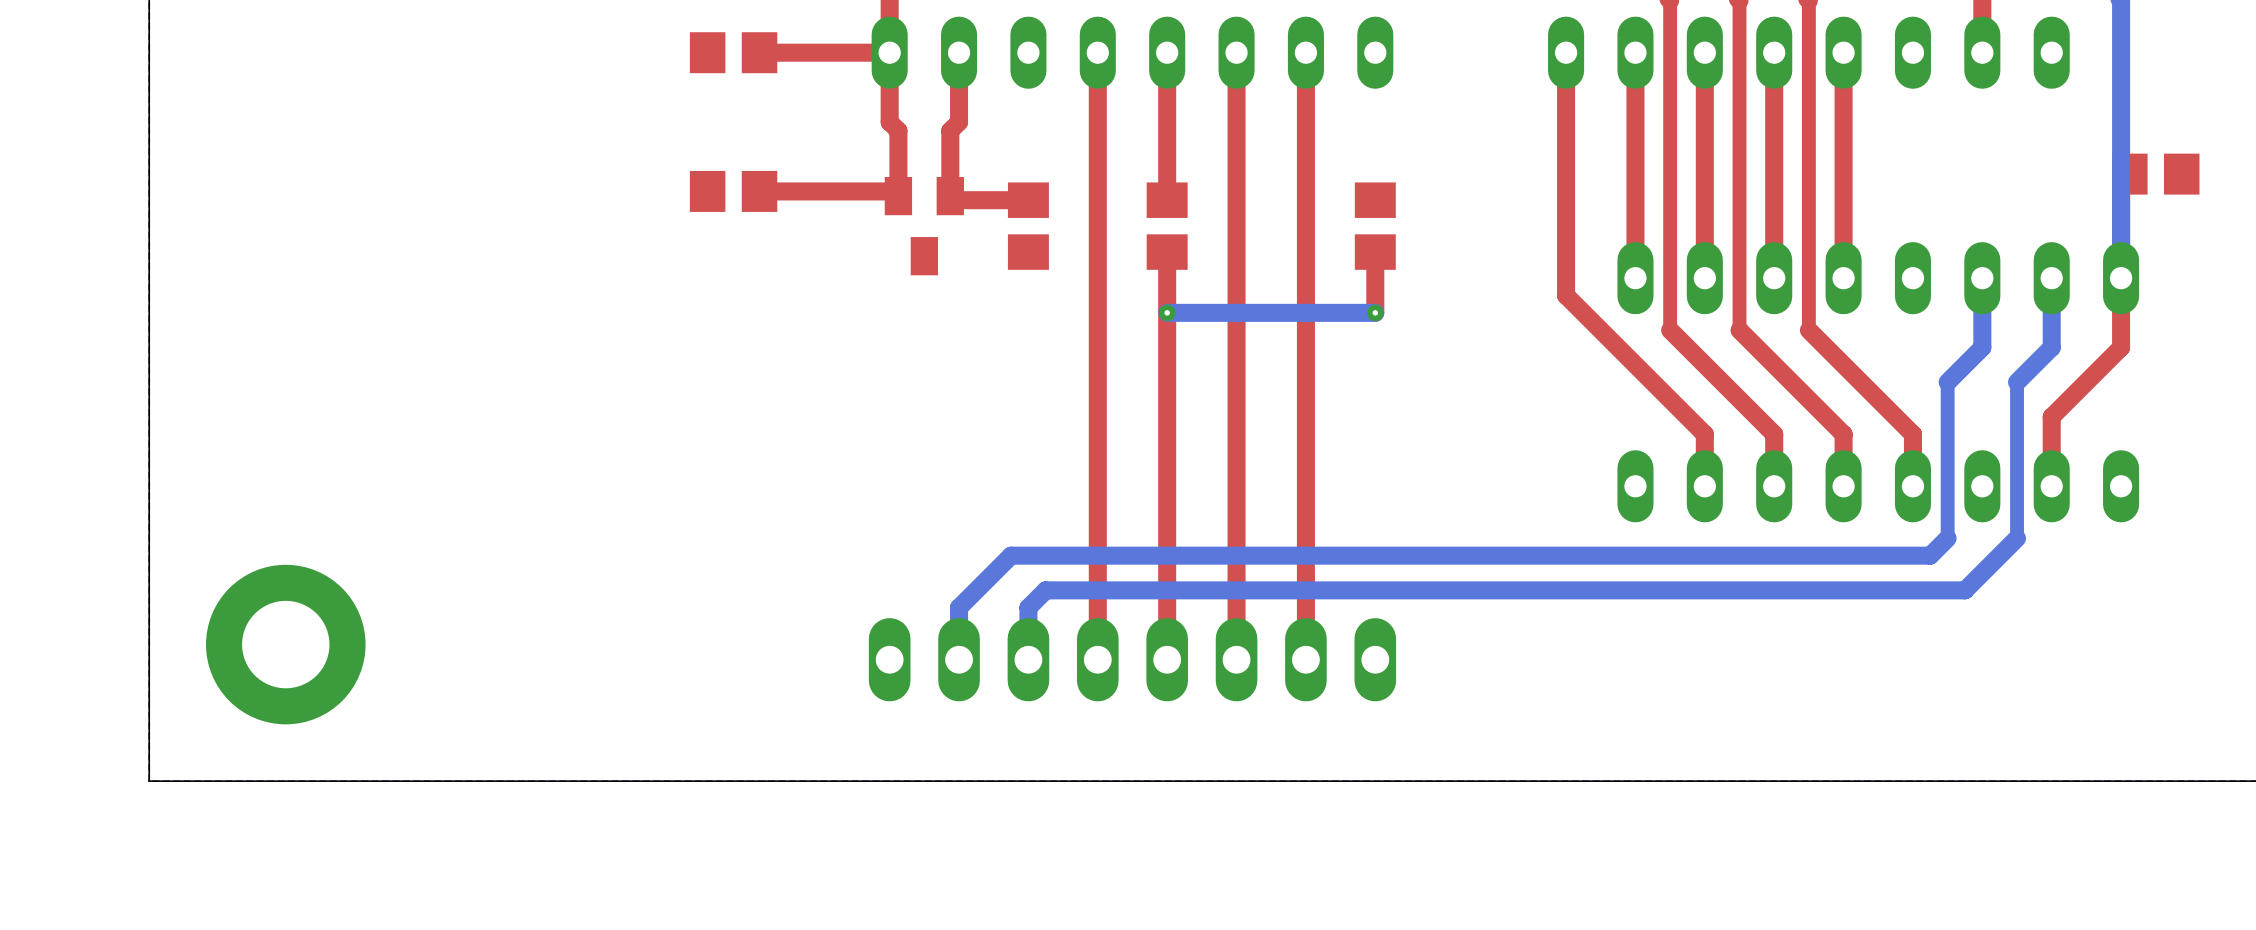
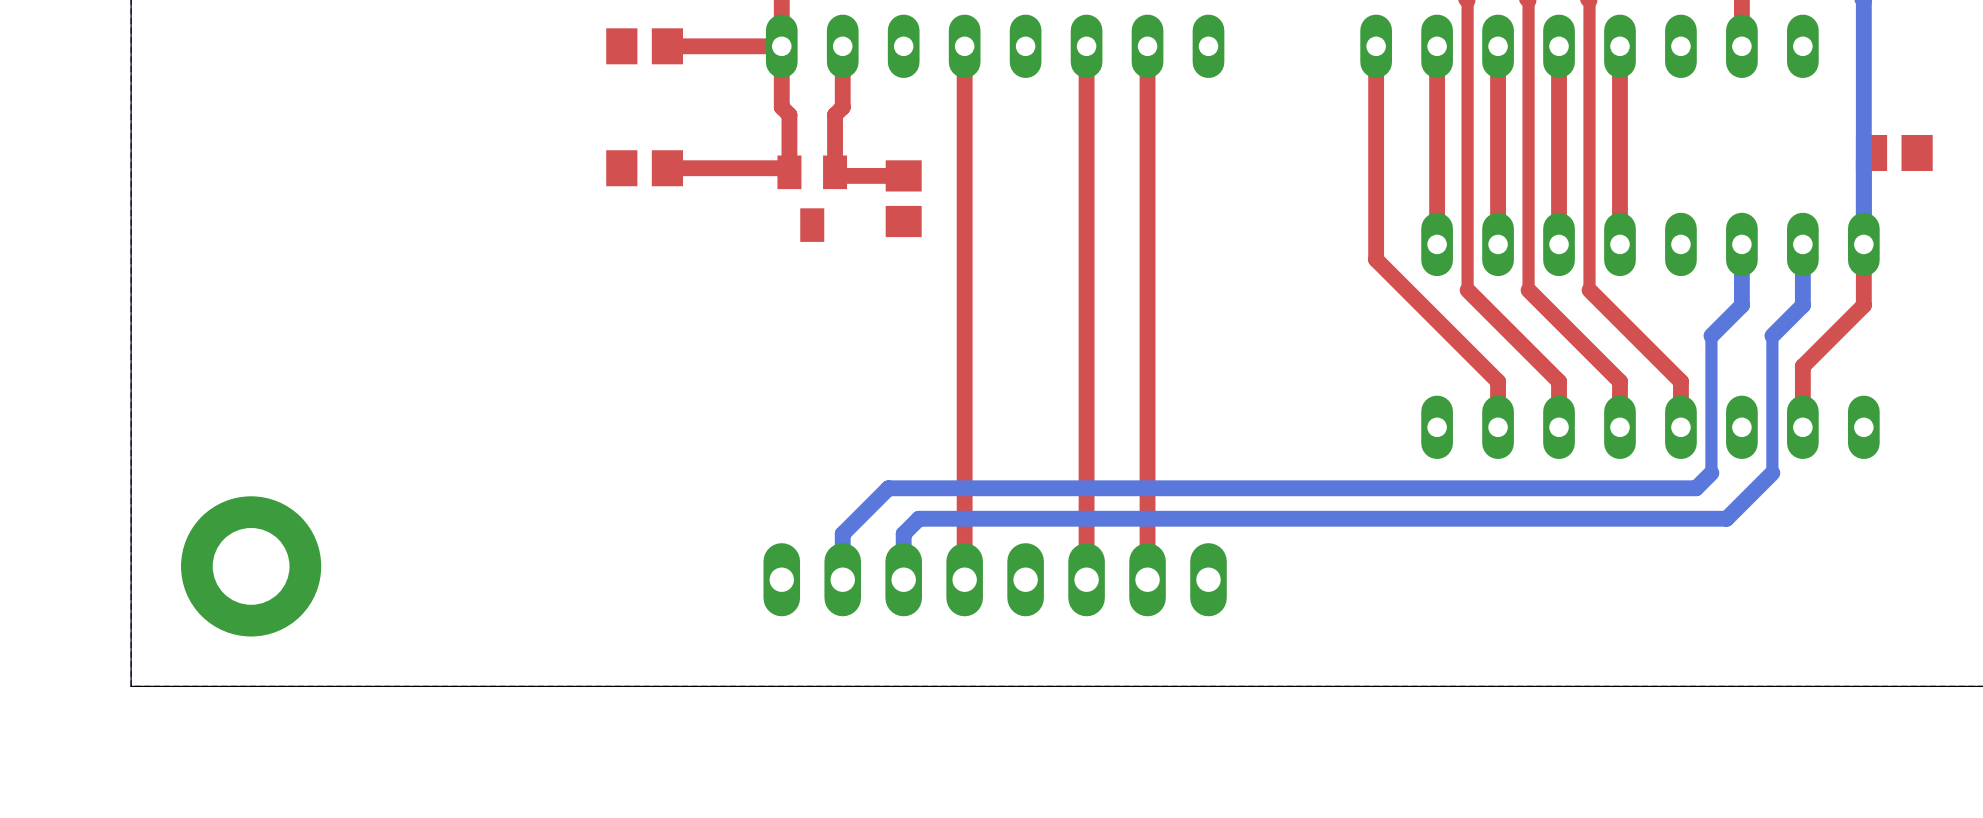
top track: (1167, 52) (1167, 200) -> none
part: (1167, 226) -> none
part: (1375, 226) -> none
top track: (1167, 252) (1167, 659) -> none
top track: (1375, 252) (1375, 312) -> none
via: (1167, 312) -> none
bottom track: (1375, 312) (1167, 312) -> none
via: (1375, 312) -> none

